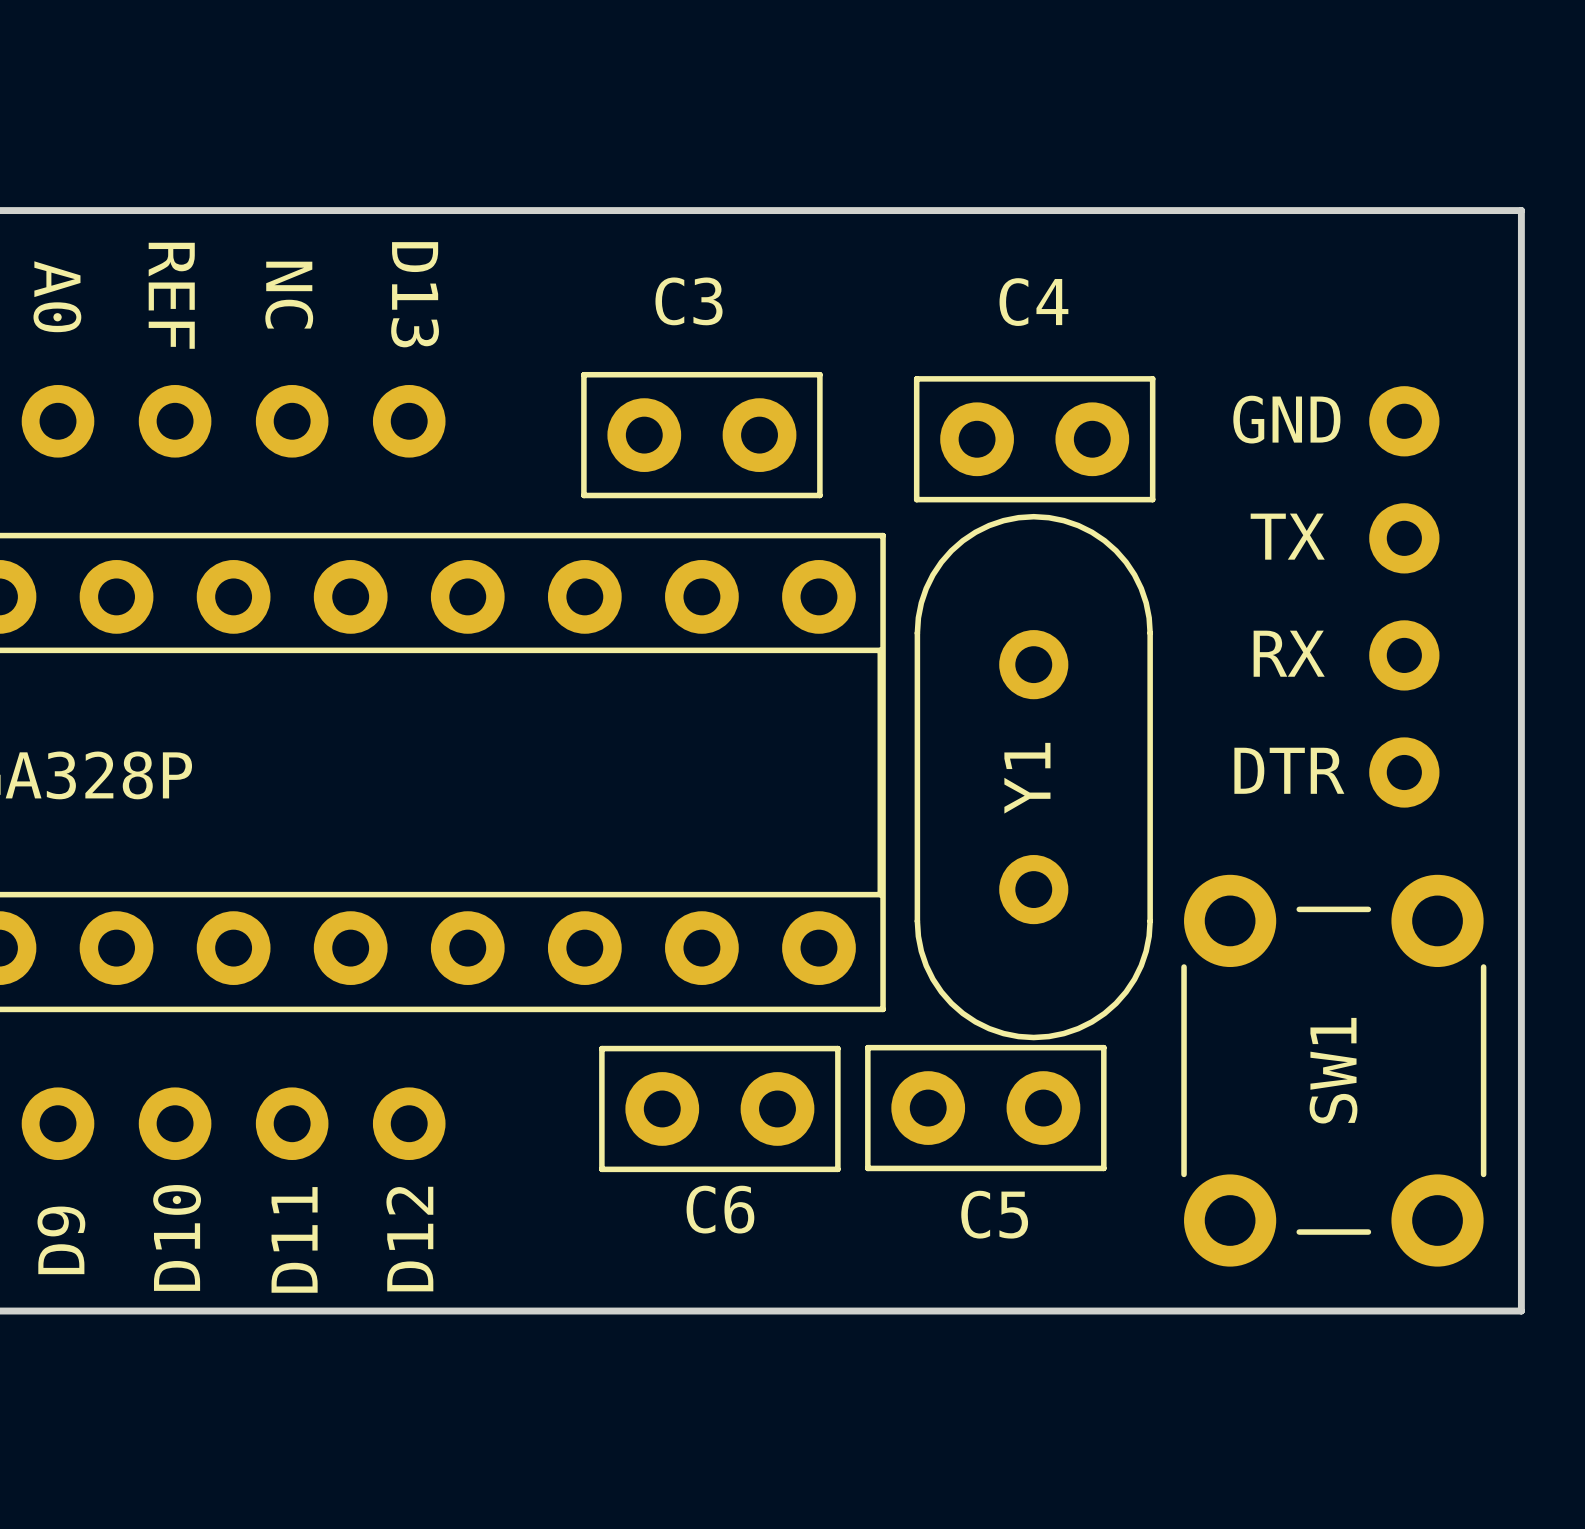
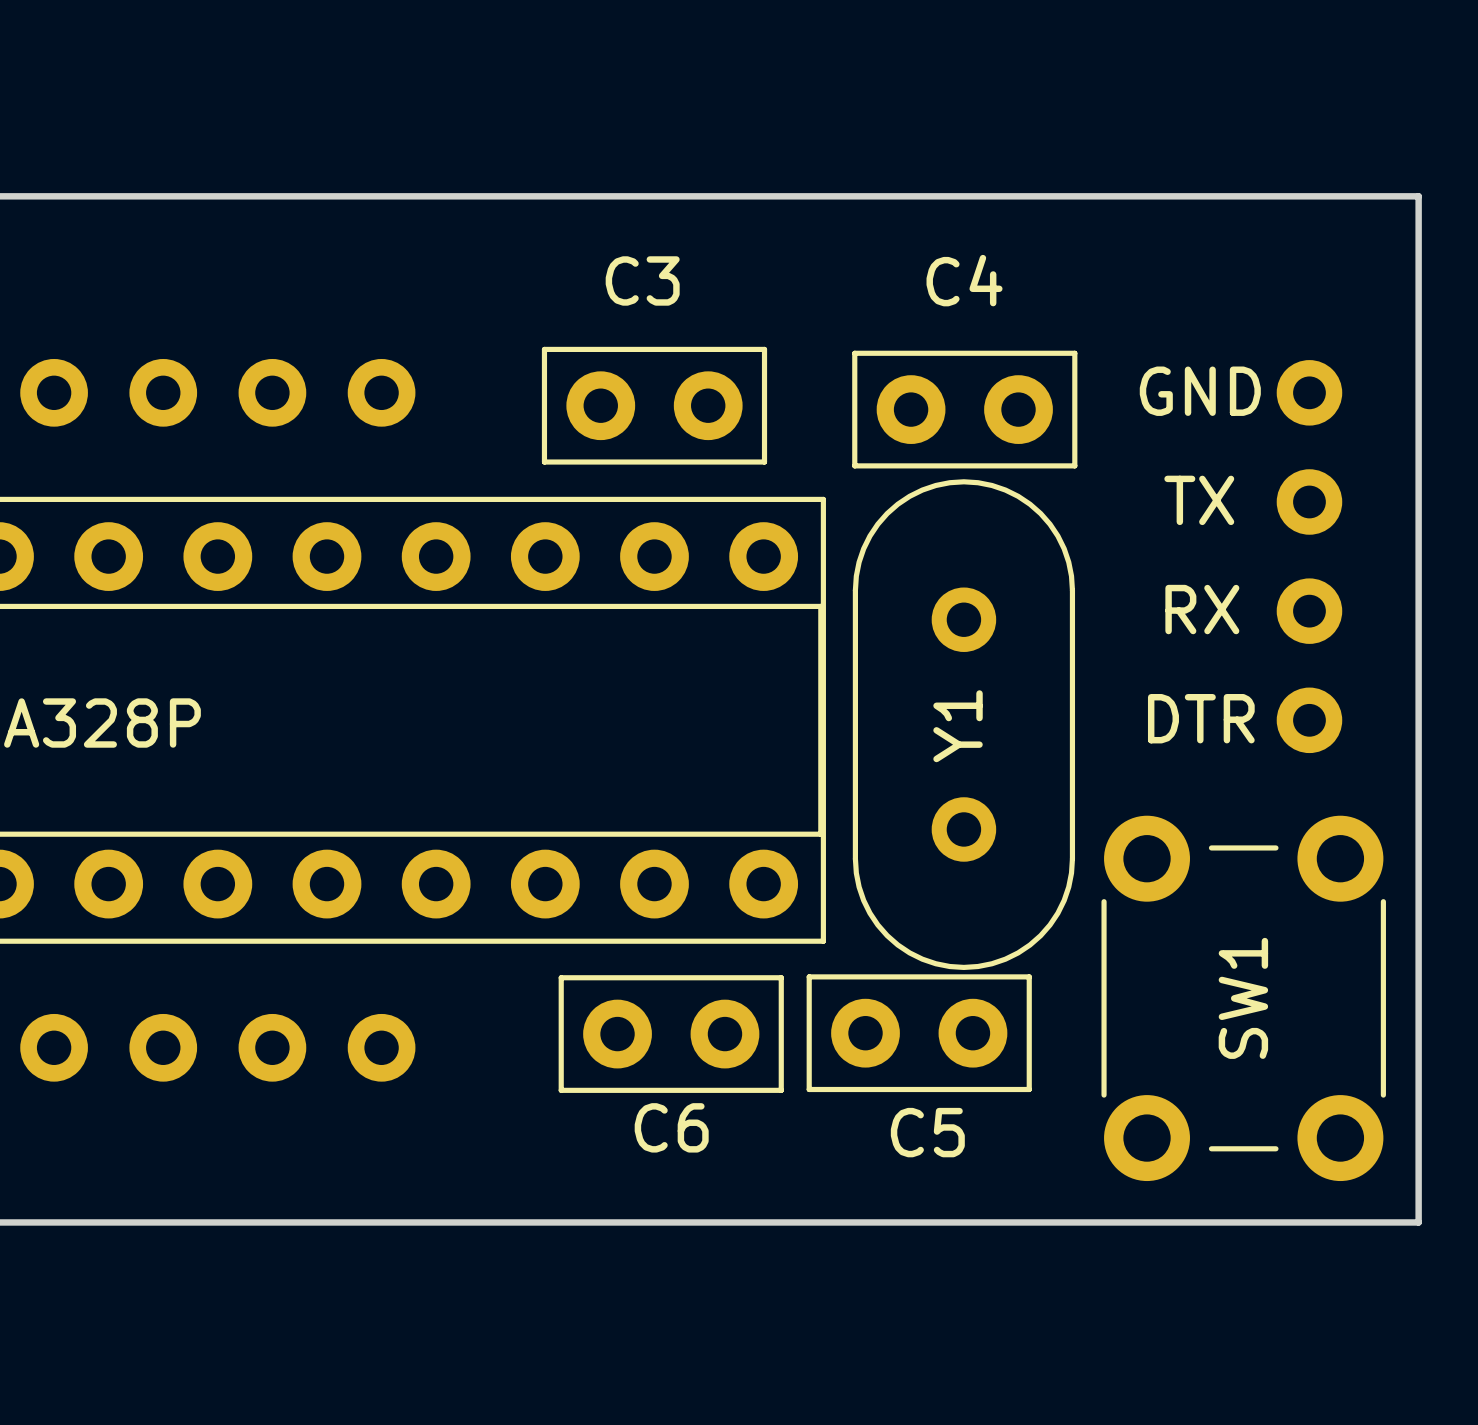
text: D13 (415, 294) -> none
text: REF (171, 295) -> none
text: NC (289, 295) -> none
text: A0 (57, 296) -> none
text: D10 (177, 1237) -> none
text: D11 (294, 1239) -> none
text: D12 (409, 1239) -> none
text: D9 (61, 1240) -> none

